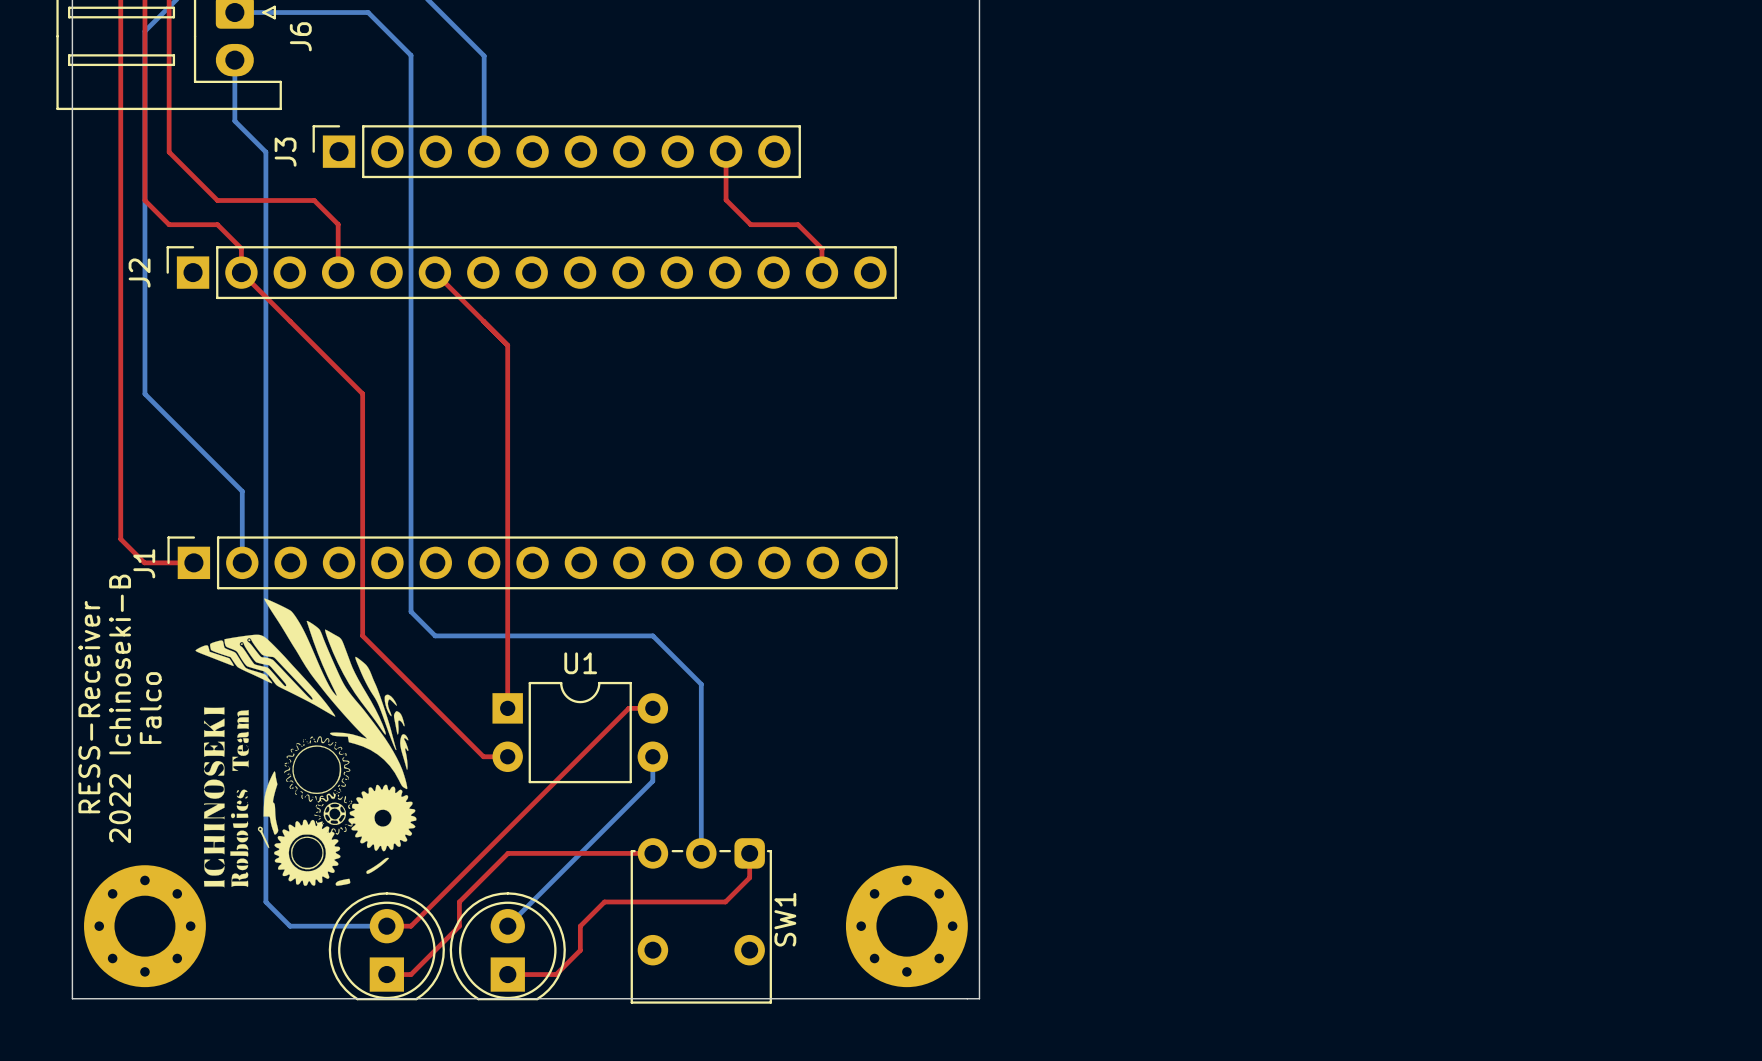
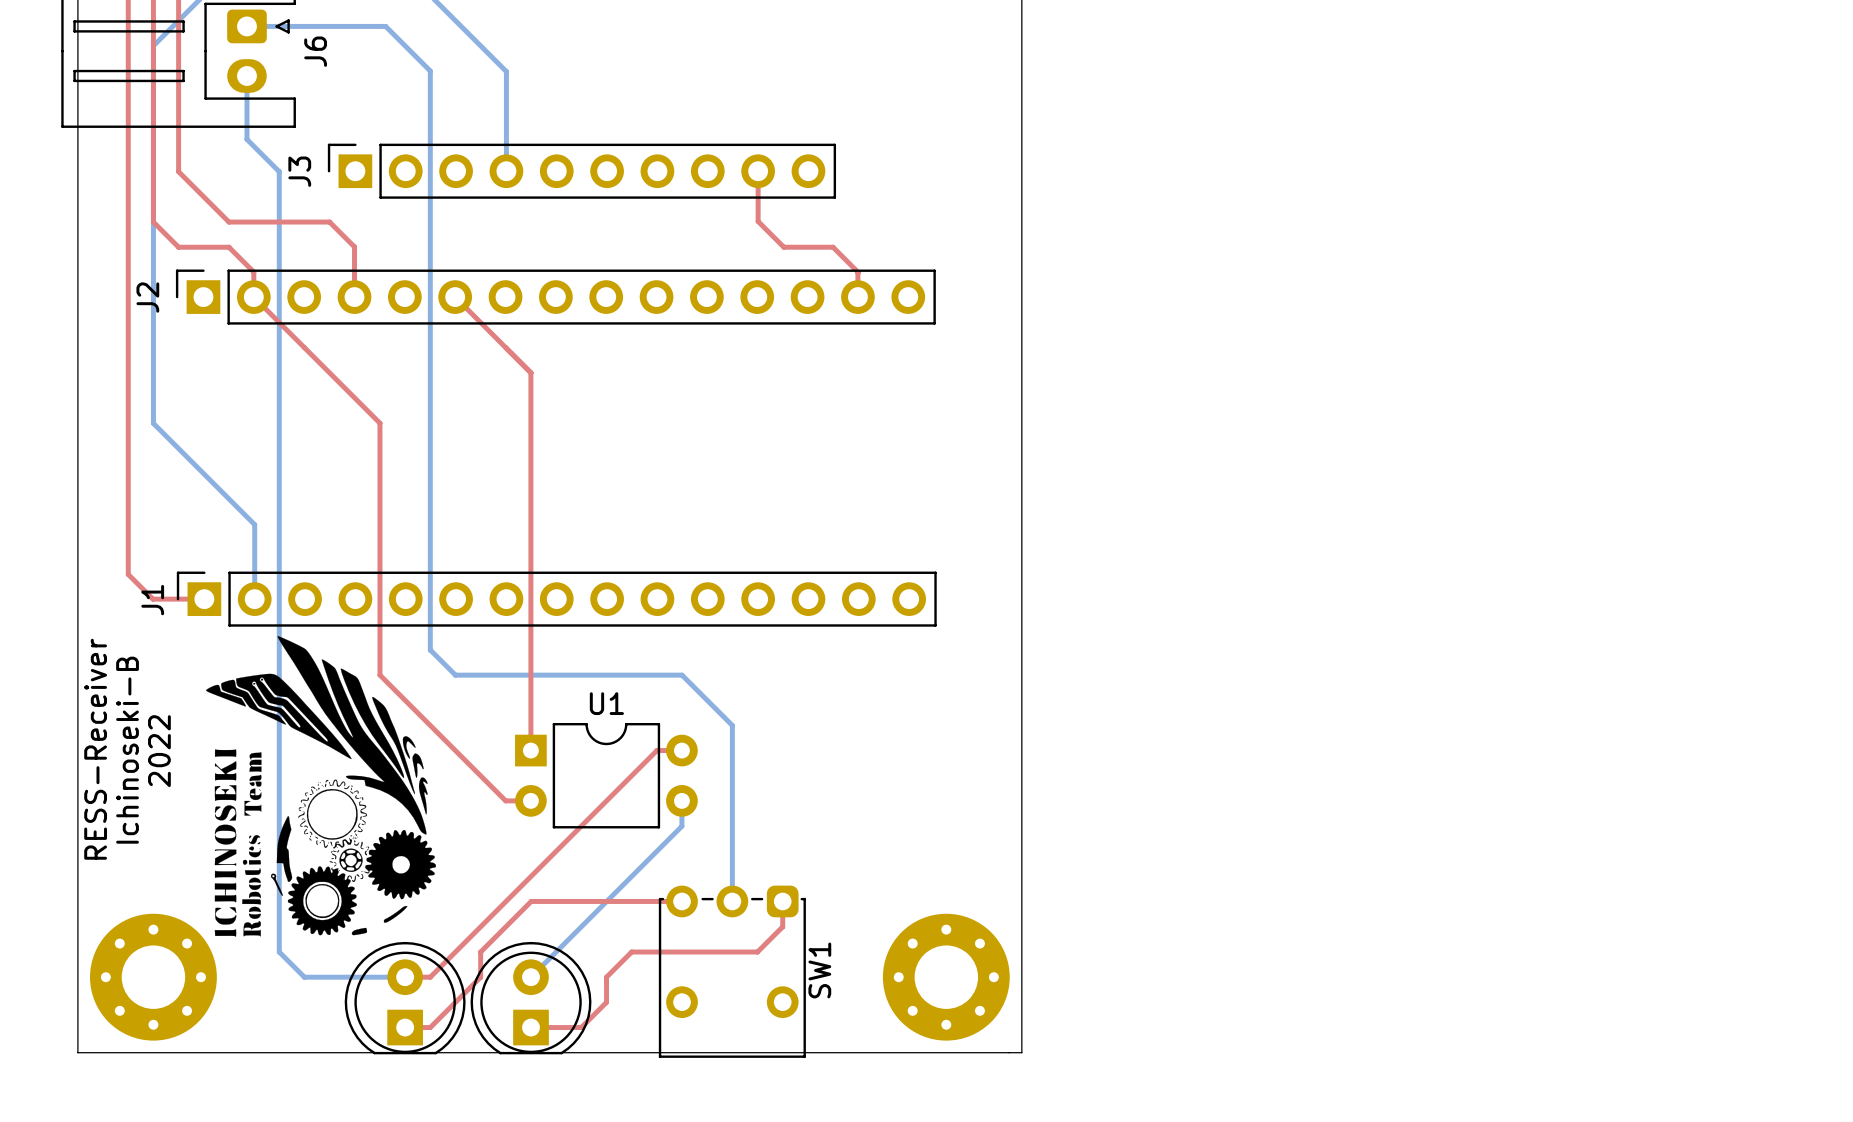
text: 2022 Ichinoseki-B (120, 708) -> Ichinoseki-B (127, 750)
text: Falco (150, 708) -> 2022 (159, 751)

